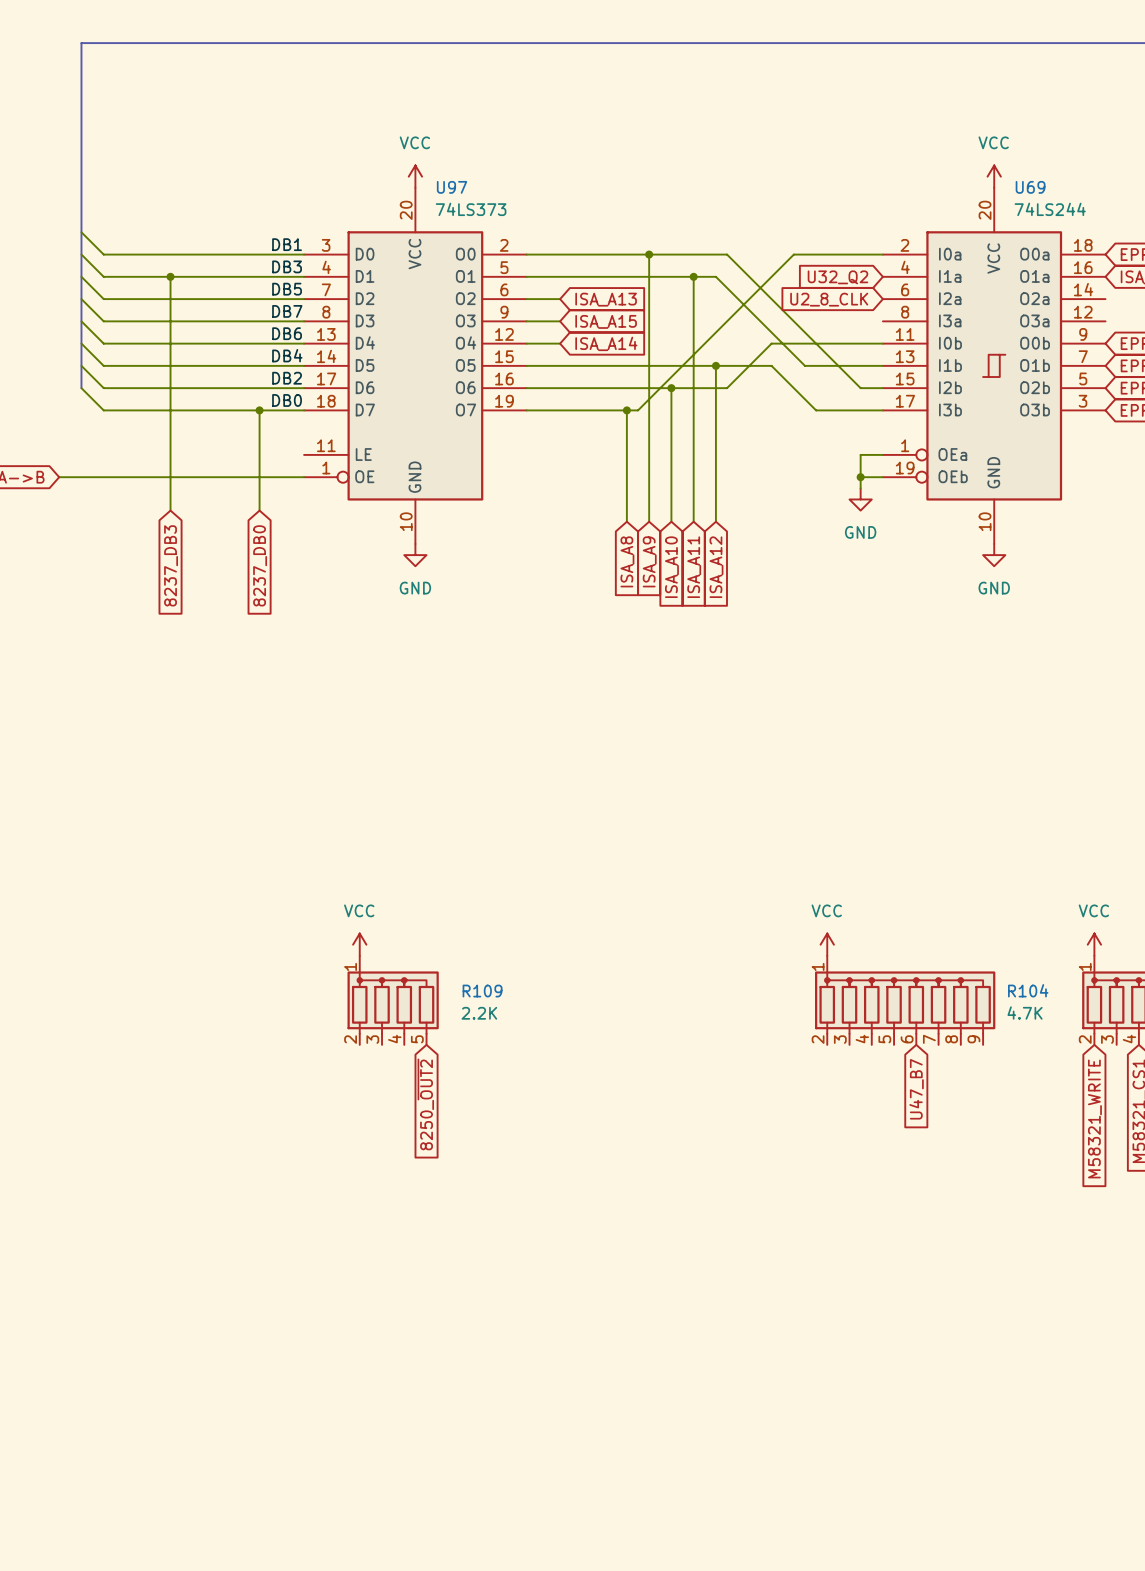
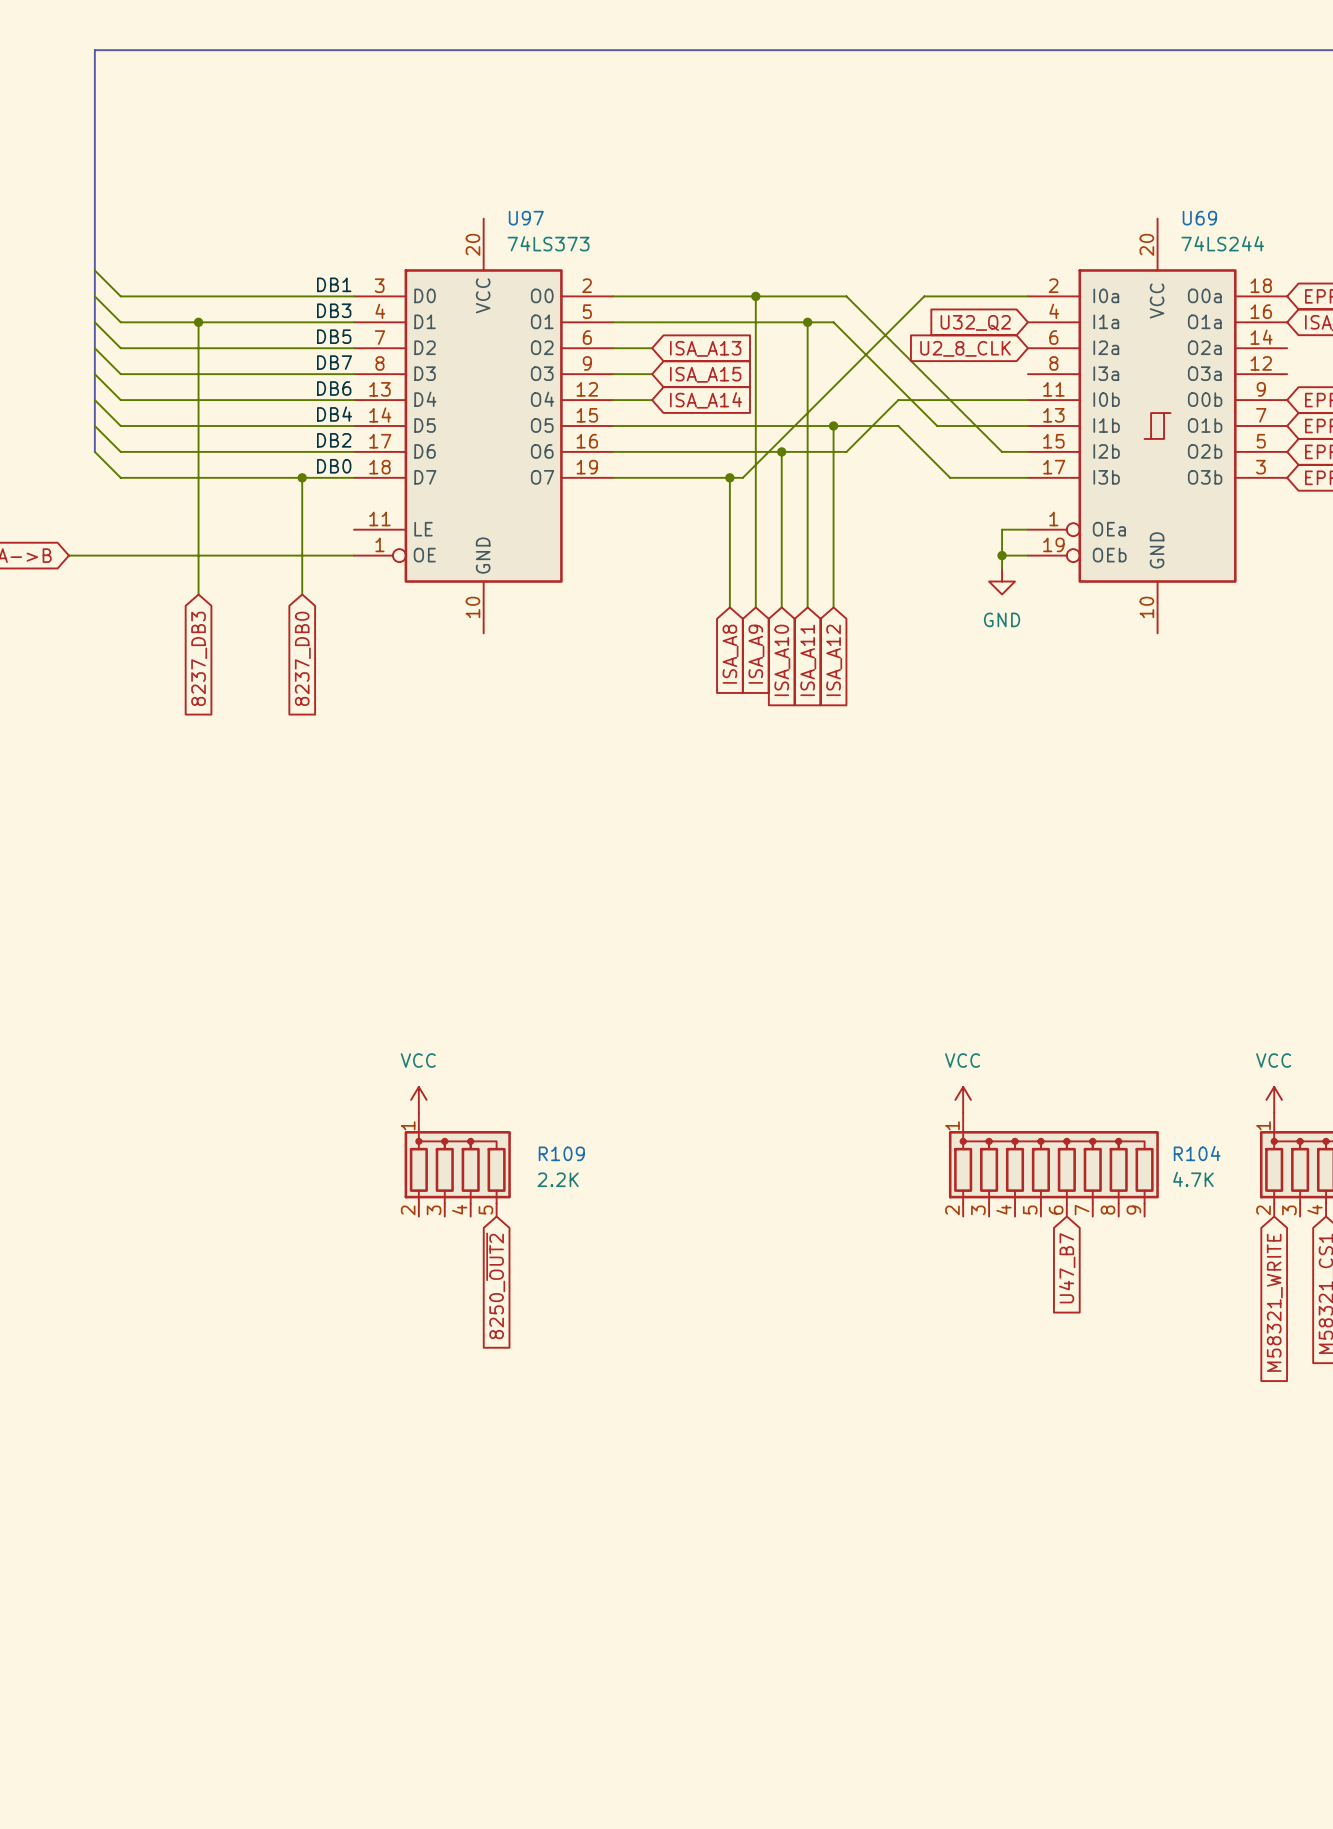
power symbol: VCC (415, 176) -> none
power symbol: VCC (994, 176) -> none
power symbol: GND (415, 555) -> none
power symbol: GND (994, 555) -> none

